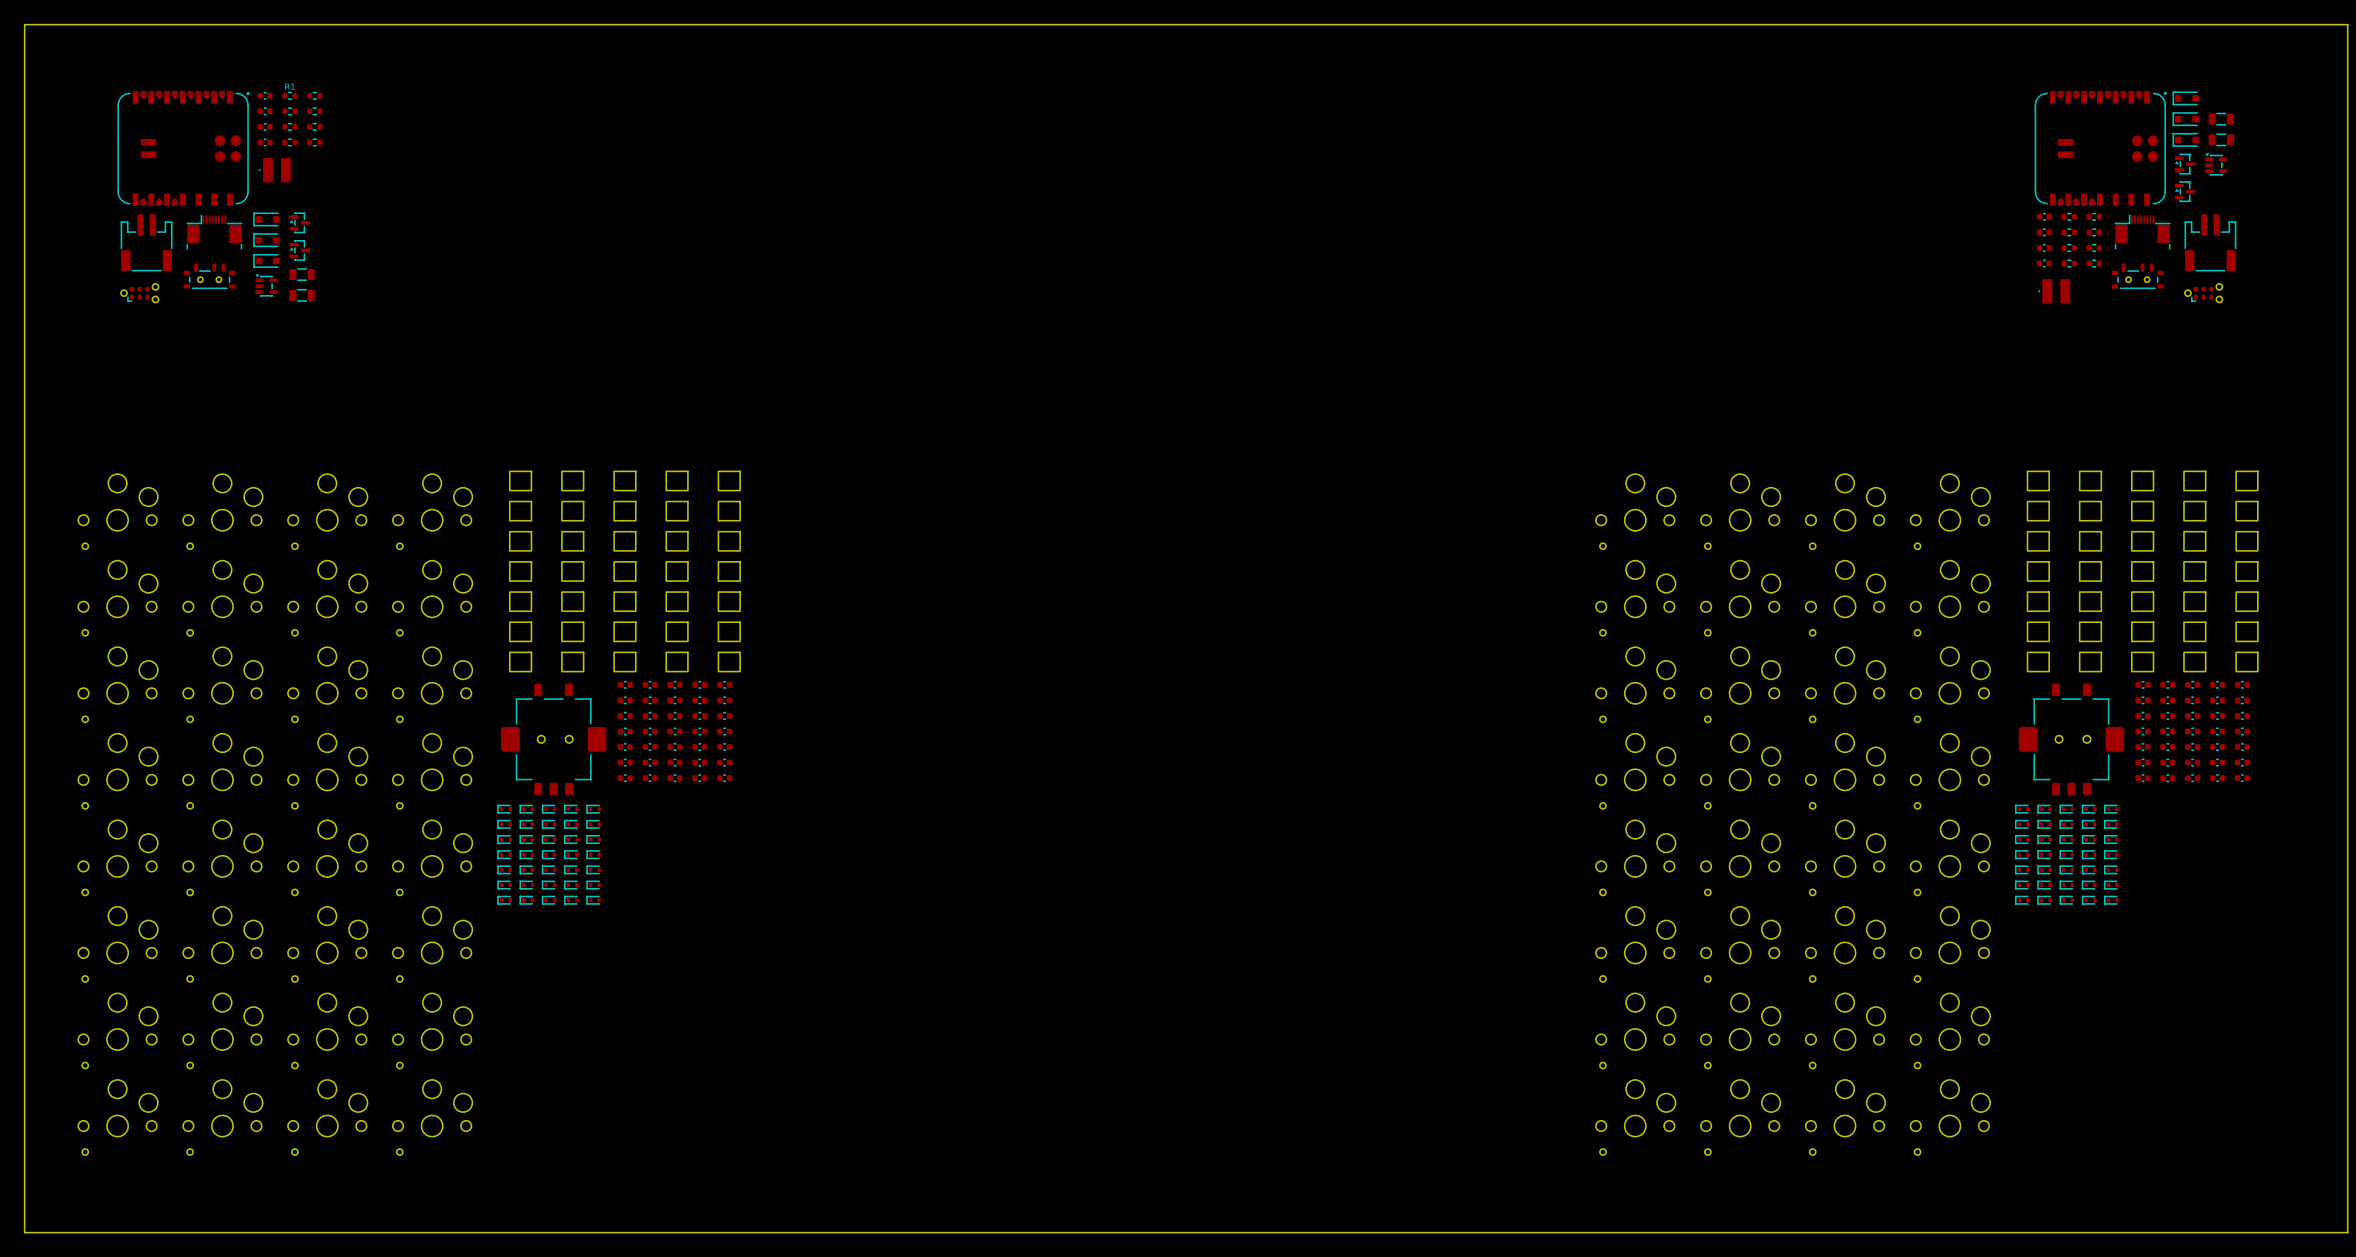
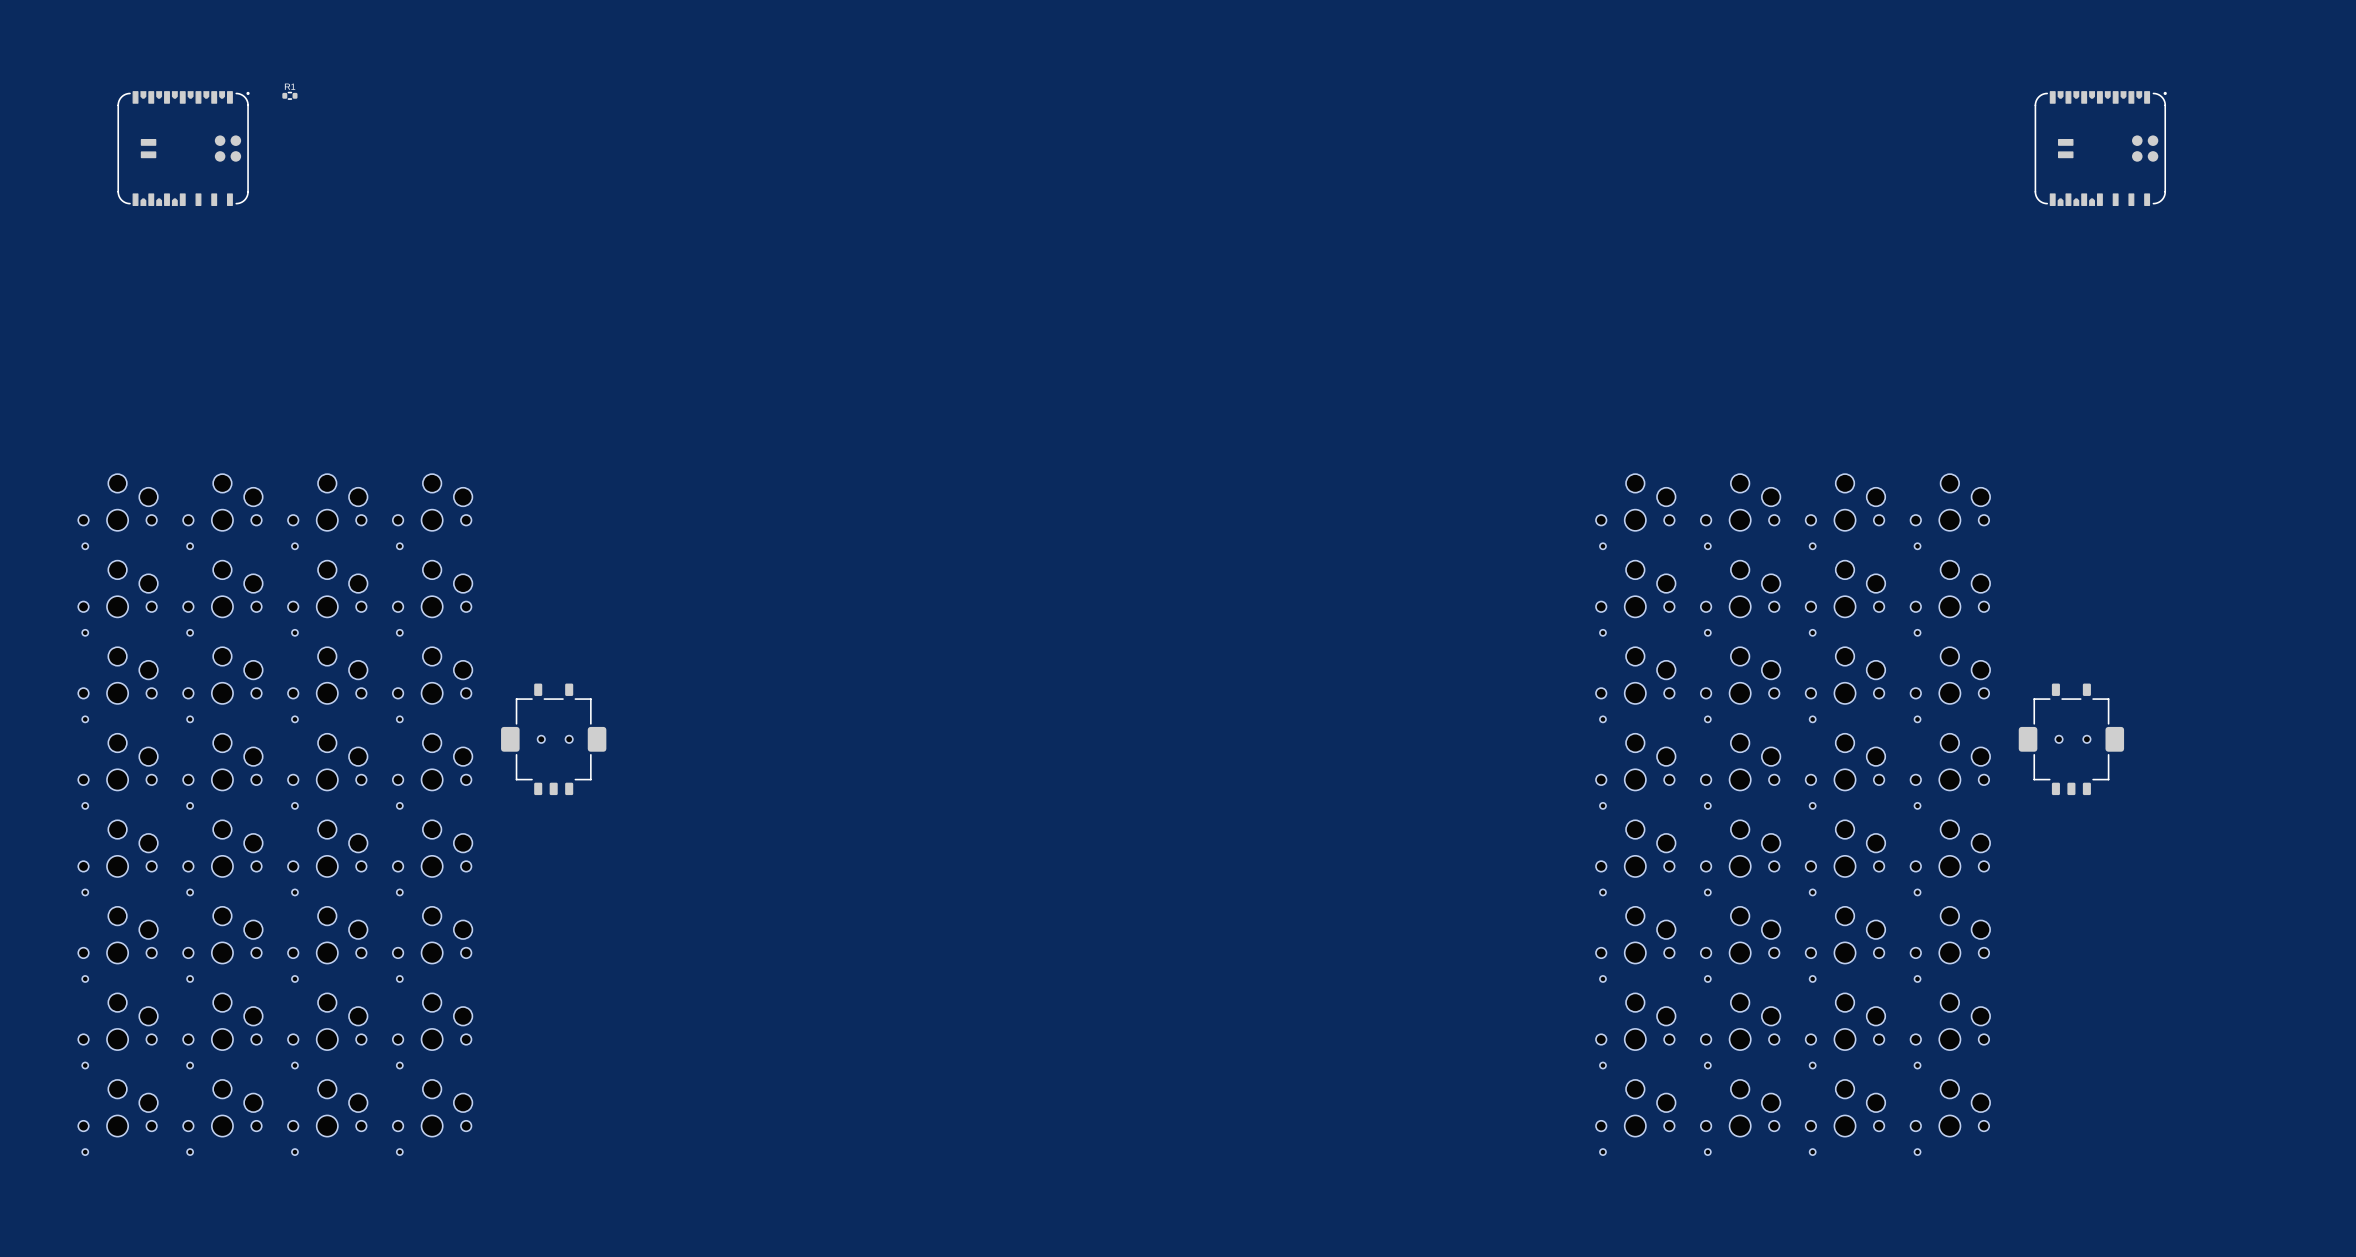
board edge: (24, 24) (2347, 24) (2347, 1232) (24, 1232) (24, 24) -> none
part: (265, 95) -> none
part: (314, 95) -> none
part: (2186, 98) -> none
part: (265, 111) -> none
part: (289, 111) -> none
part: (314, 111) -> none
part: (2186, 119) -> none
part: (2221, 119) -> none
part: (265, 126) -> none
part: (289, 126) -> none
part: (314, 126) -> none
part: (2186, 139) -> none
part: (2221, 139) -> none
part: (265, 142) -> none
part: (289, 142) -> none
part: (314, 142) -> none
part: (2185, 164) -> none
part: (2216, 164) -> none
part: (274, 170) -> none
part: (2185, 191) -> none
part: (2044, 216) -> none
part: (2069, 216) -> none
part: (2094, 216) -> none
part: (266, 219) -> none
part: (299, 222) -> none
part: (214, 232) -> none
part: (2044, 232) -> none
part: (2069, 232) -> none
part: (2094, 232) -> none
part: (2142, 232) -> none
part: (266, 240) -> none
part: (146, 242) -> none
part: (2210, 242) -> none
part: (2044, 247) -> none
part: (2069, 247) -> none
part: (2094, 247) -> none
part: (299, 250) -> none
part: (266, 260) -> none
part: (2044, 263) -> none
part: (2069, 263) -> none
part: (2094, 263) -> none
part: (301, 274) -> none
part: (209, 276) -> none
part: (2137, 276) -> none
part: (266, 285) -> none
part: (2054, 291) -> none
part: (139, 293) -> none
part: (2203, 293) -> none
part: (301, 295) -> none
part: (520, 480) -> none
part: (572, 480) -> none
part: (624, 480) -> none
part: (677, 480) -> none
part: (729, 480) -> none
part: (2038, 480) -> none
part: (2090, 480) -> none
part: (2142, 480) -> none
part: (2194, 480) -> none
part: (2246, 480) -> none
part: (520, 511) -> none
part: (572, 511) -> none
part: (624, 511) -> none
part: (677, 511) -> none
part: (729, 511) -> none
part: (2038, 511) -> none
part: (2090, 511) -> none
part: (2142, 511) -> none
part: (2194, 511) -> none
part: (2246, 511) -> none
part: (520, 541) -> none
part: (572, 541) -> none
part: (624, 541) -> none
part: (677, 541) -> none
part: (729, 541) -> none
part: (2038, 541) -> none
part: (2090, 541) -> none
part: (2142, 541) -> none
part: (2194, 541) -> none
part: (2246, 541) -> none
part: (520, 571) -> none
part: (572, 571) -> none
part: (624, 571) -> none
part: (677, 571) -> none
part: (729, 571) -> none
part: (2038, 571) -> none
part: (2090, 571) -> none
part: (2142, 571) -> none
part: (2194, 571) -> none
part: (2246, 571) -> none
part: (520, 601) -> none
part: (572, 601) -> none
part: (624, 601) -> none
part: (677, 601) -> none
part: (729, 601) -> none
part: (2038, 601) -> none
part: (2090, 601) -> none
part: (2142, 601) -> none
part: (2194, 601) -> none
part: (2246, 601) -> none
part: (520, 631) -> none
part: (572, 631) -> none
part: (624, 631) -> none
part: (677, 631) -> none
part: (729, 631) -> none
part: (2038, 631) -> none
part: (2090, 631) -> none
part: (2142, 631) -> none
part: (2194, 631) -> none
part: (2246, 631) -> none
part: (520, 661) -> none
part: (572, 661) -> none
part: (624, 661) -> none
part: (677, 661) -> none
part: (729, 661) -> none
part: (2038, 661) -> none
part: (2090, 661) -> none
part: (2142, 661) -> none
part: (2194, 661) -> none
part: (2246, 661) -> none
part: (625, 684) -> none
part: (650, 684) -> none
part: (674, 684) -> none
part: (699, 684) -> none
part: (724, 684) -> none
part: (2142, 684) -> none
part: (2167, 684) -> none
part: (2192, 684) -> none
part: (2217, 684) -> none
part: (2242, 684) -> none
part: (625, 700) -> none
part: (650, 700) -> none
part: (674, 700) -> none
part: (699, 700) -> none
part: (724, 700) -> none
part: (2142, 700) -> none
part: (2167, 700) -> none
part: (2192, 700) -> none
part: (2217, 700) -> none
part: (2242, 700) -> none
part: (625, 715) -> none
part: (650, 715) -> none
part: (674, 715) -> none
part: (699, 715) -> none
part: (724, 715) -> none
part: (2142, 715) -> none
part: (2167, 715) -> none
part: (2192, 715) -> none
part: (2217, 715) -> none
part: (2242, 715) -> none
part: (625, 731) -> none
part: (650, 731) -> none
part: (674, 731) -> none
part: (699, 731) -> none
part: (724, 731) -> none
part: (2142, 731) -> none
part: (2167, 731) -> none
part: (2192, 731) -> none
part: (2217, 731) -> none
part: (2242, 731) -> none
part: (625, 747) -> none
part: (650, 747) -> none
part: (674, 747) -> none
part: (699, 747) -> none
part: (724, 747) -> none
part: (2142, 747) -> none
part: (2167, 747) -> none
part: (2192, 747) -> none
part: (2217, 747) -> none
part: (2242, 747) -> none
part: (625, 762) -> none
part: (650, 762) -> none
part: (674, 762) -> none
part: (699, 762) -> none
part: (724, 762) -> none
part: (2142, 762) -> none
part: (2167, 762) -> none
part: (2192, 762) -> none
part: (2217, 762) -> none
part: (2242, 762) -> none
part: (625, 778) -> none
part: (650, 778) -> none
part: (674, 778) -> none
part: (699, 778) -> none
part: (724, 778) -> none
part: (2142, 778) -> none
part: (2167, 778) -> none
part: (2192, 778) -> none
part: (2217, 778) -> none
part: (2242, 778) -> none
part: (504, 809) -> none
part: (527, 809) -> none
part: (549, 809) -> none
part: (571, 809) -> none
part: (593, 809) -> none
part: (2022, 809) -> none
part: (2044, 809) -> none
part: (2067, 809) -> none
part: (2089, 809) -> none
part: (2111, 809) -> none
part: (504, 824) -> none
part: (527, 824) -> none
part: (549, 824) -> none
part: (571, 824) -> none
part: (593, 824) -> none
part: (2022, 824) -> none
part: (2044, 824) -> none
part: (2067, 824) -> none
part: (2089, 824) -> none
part: (2111, 824) -> none
part: (504, 839) -> none
part: (527, 839) -> none
part: (549, 839) -> none
part: (571, 839) -> none
part: (593, 839) -> none
part: (2022, 839) -> none
part: (2044, 839) -> none
part: (2067, 839) -> none
part: (2089, 839) -> none
part: (2111, 839) -> none
part: (504, 854) -> none
part: (527, 854) -> none
part: (549, 854) -> none
part: (571, 854) -> none
part: (593, 854) -> none
part: (2022, 854) -> none
part: (2044, 854) -> none
part: (2067, 854) -> none
part: (2089, 854) -> none
part: (2111, 854) -> none
part: (504, 869) -> none
part: (527, 869) -> none
part: (549, 869) -> none
part: (571, 869) -> none
part: (593, 869) -> none
part: (2022, 869) -> none
part: (2044, 869) -> none
part: (2067, 869) -> none
part: (2089, 869) -> none
part: (2111, 869) -> none
part: (504, 885) -> none
part: (527, 885) -> none
part: (549, 885) -> none
part: (571, 885) -> none
part: (593, 885) -> none
part: (2022, 885) -> none
part: (2044, 885) -> none
part: (2067, 885) -> none
part: (2089, 885) -> none
part: (2111, 885) -> none
part: (504, 900) -> none
part: (527, 900) -> none
part: (549, 900) -> none
part: (571, 900) -> none
part: (593, 900) -> none
part: (2022, 900) -> none
part: (2044, 900) -> none
part: (2067, 900) -> none
part: (2089, 900) -> none
part: (2111, 900) -> none

